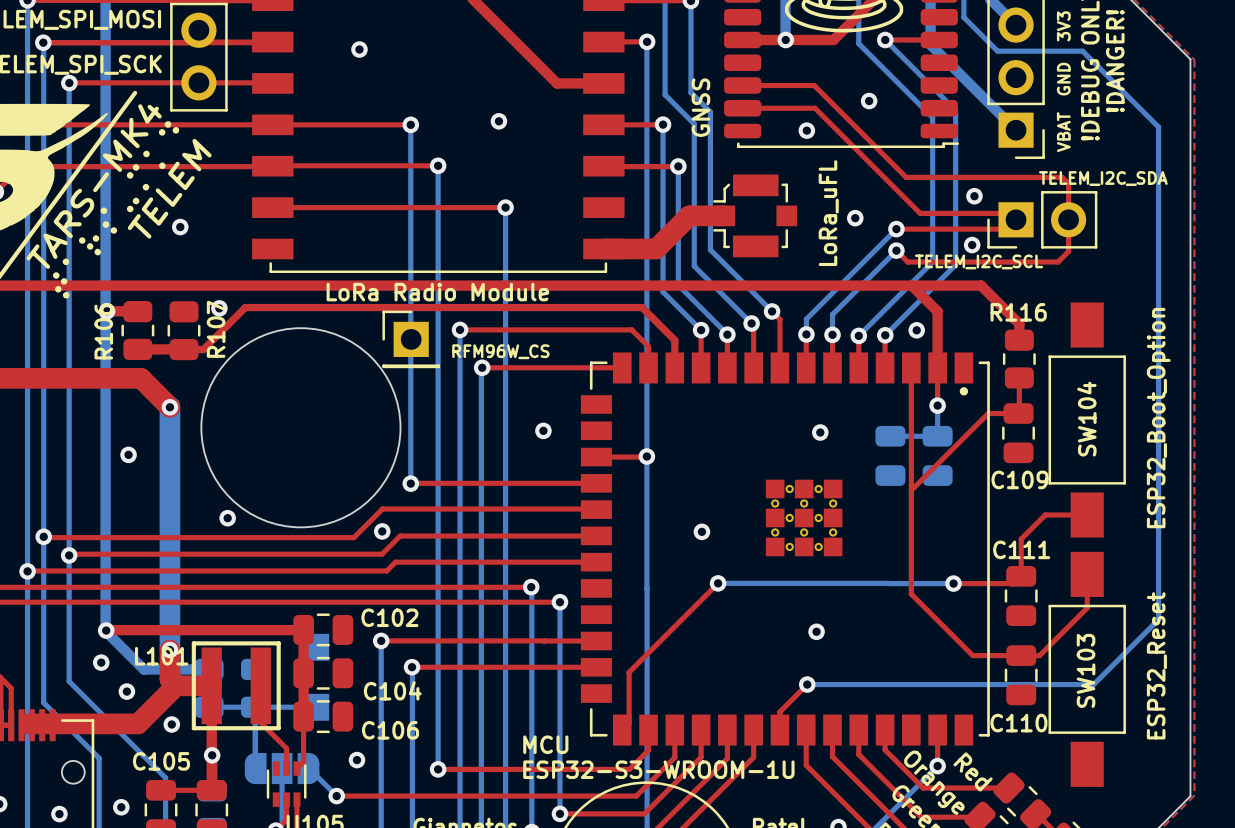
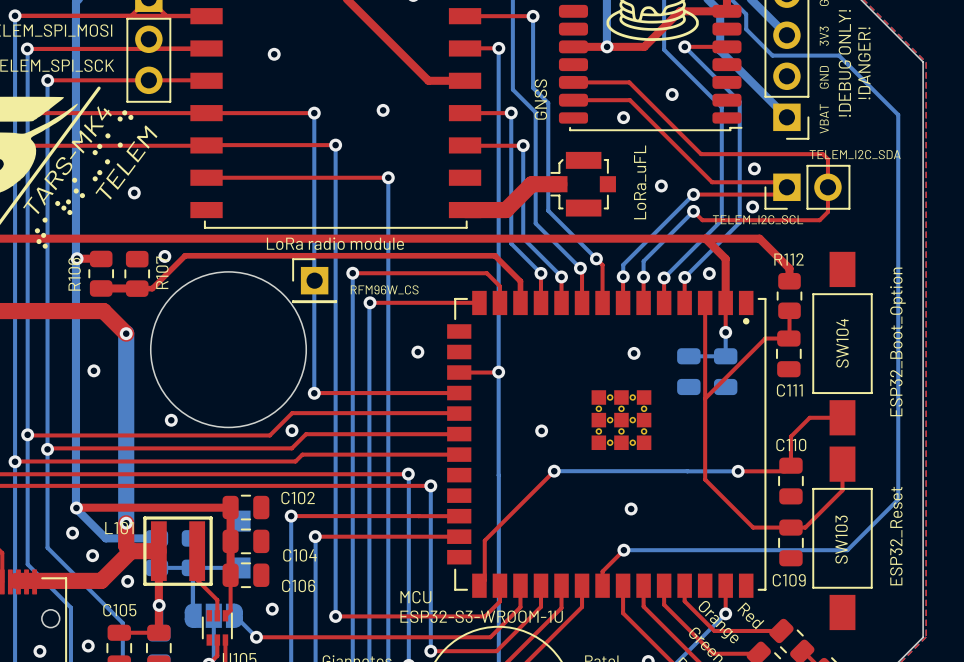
text: LoRa Radio Module (437, 292) -> LoRa radio module (335, 243)
R116 name: R116 (1018, 312) -> R112 (789, 259)
C109 name: C109 (1019, 479) -> C111 (789, 390)
C111 name: C111 (1021, 549) -> C110 (791, 445)
C110 name: C110 (1018, 723) -> C109 (789, 580)

